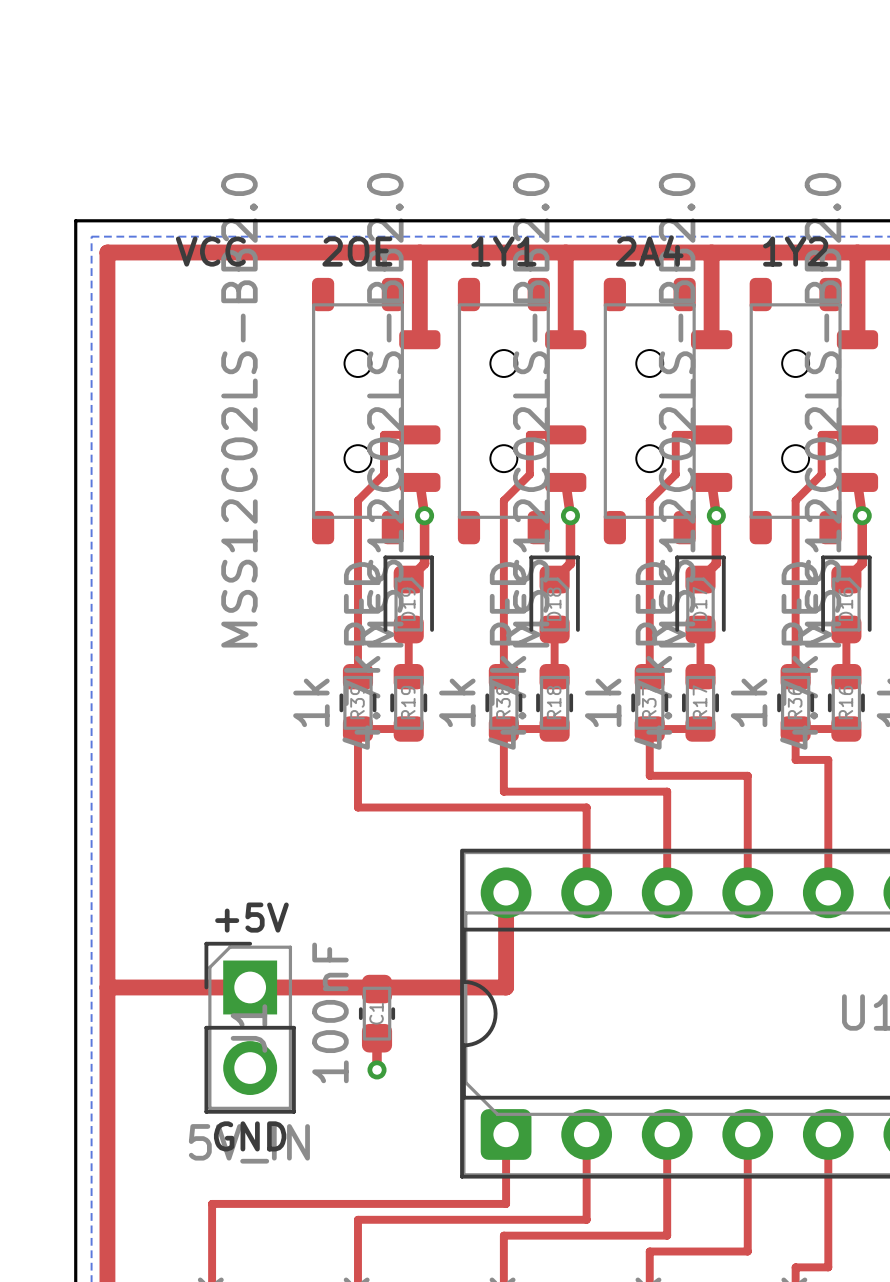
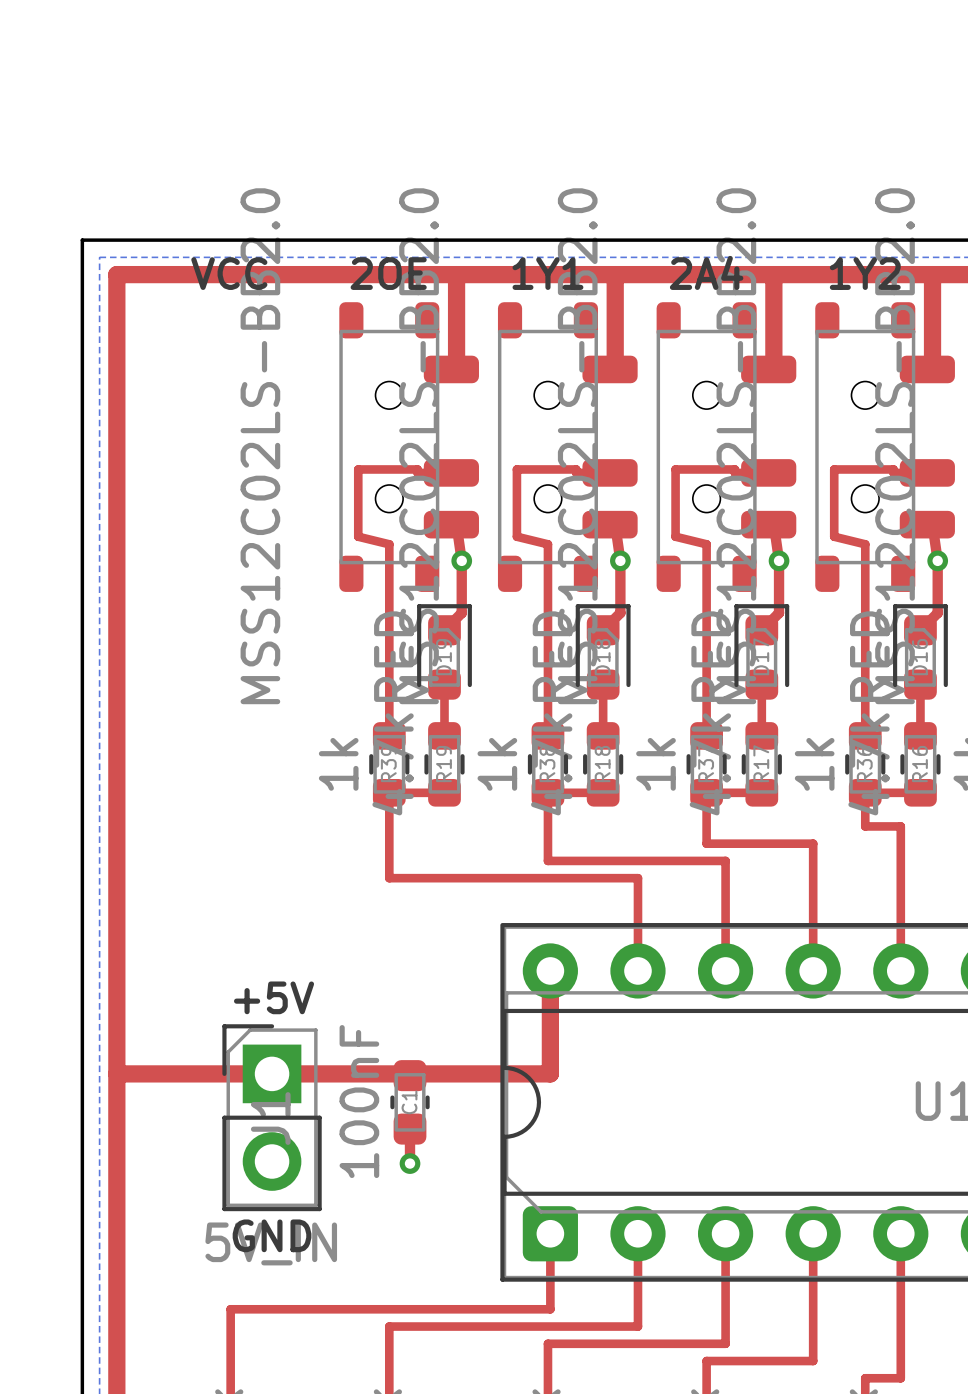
part footprint: [311, 277, 441, 545] -> [339, 302, 479, 592]
part footprint: [457, 277, 587, 545] -> [497, 302, 638, 592]
part footprint: [603, 277, 733, 545] -> [656, 302, 797, 592]
part footprint: [749, 277, 879, 545] -> [815, 302, 955, 592]
top track: (383, 434) (383, 474) (357, 500) -> (417, 472) (417, 469) (358, 469) (358, 536) (389, 544)
top track: (529, 434) (529, 474) (503, 500) -> (576, 472) (576, 469) (516, 469) (516, 536) (547, 544)
top track: (675, 434) (675, 474) (649, 500) -> (734, 472) (734, 469) (675, 469) (675, 536) (706, 544)
top track: (821, 434) (821, 474) (795, 500) -> (893, 472) (893, 469) (834, 469) (834, 536) (865, 544)

